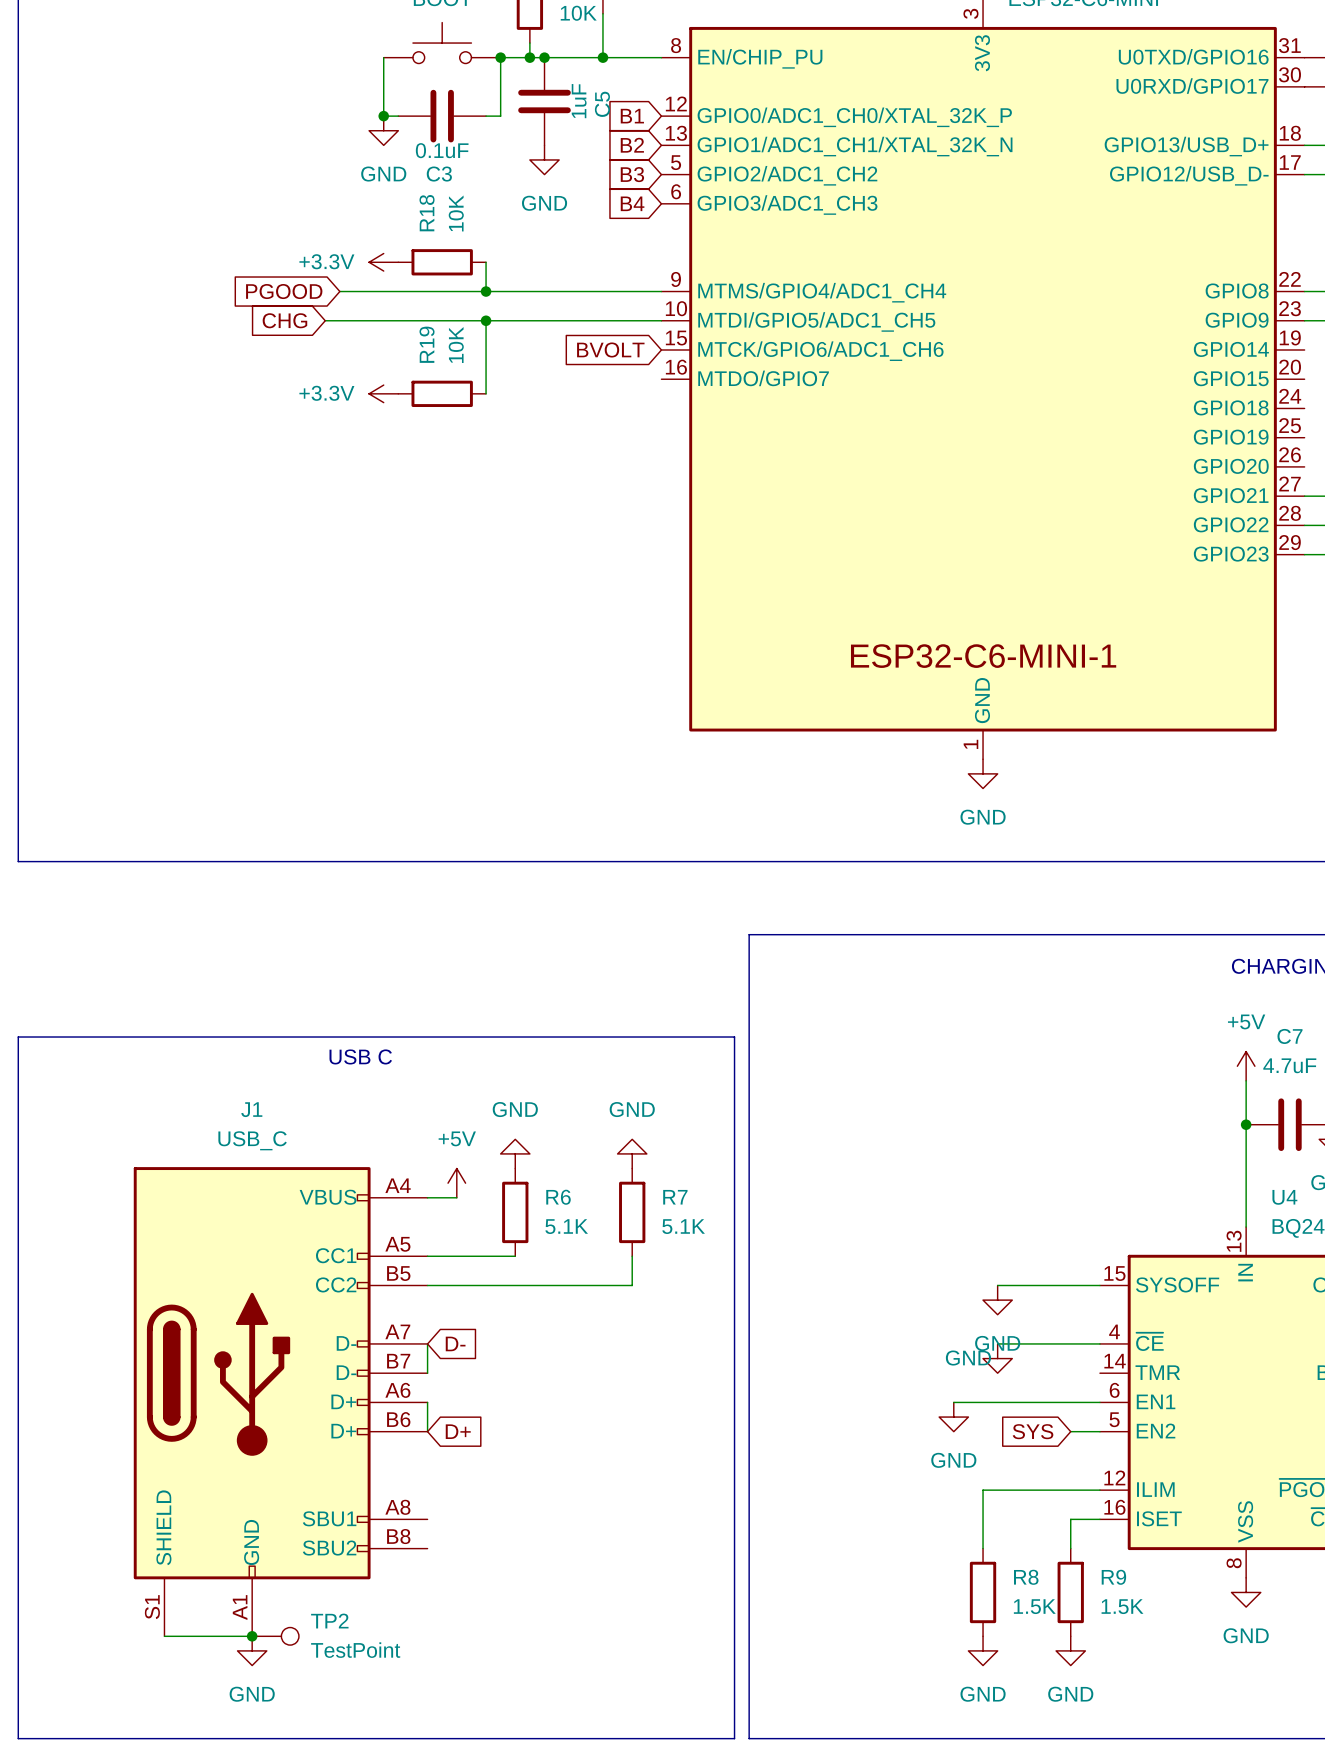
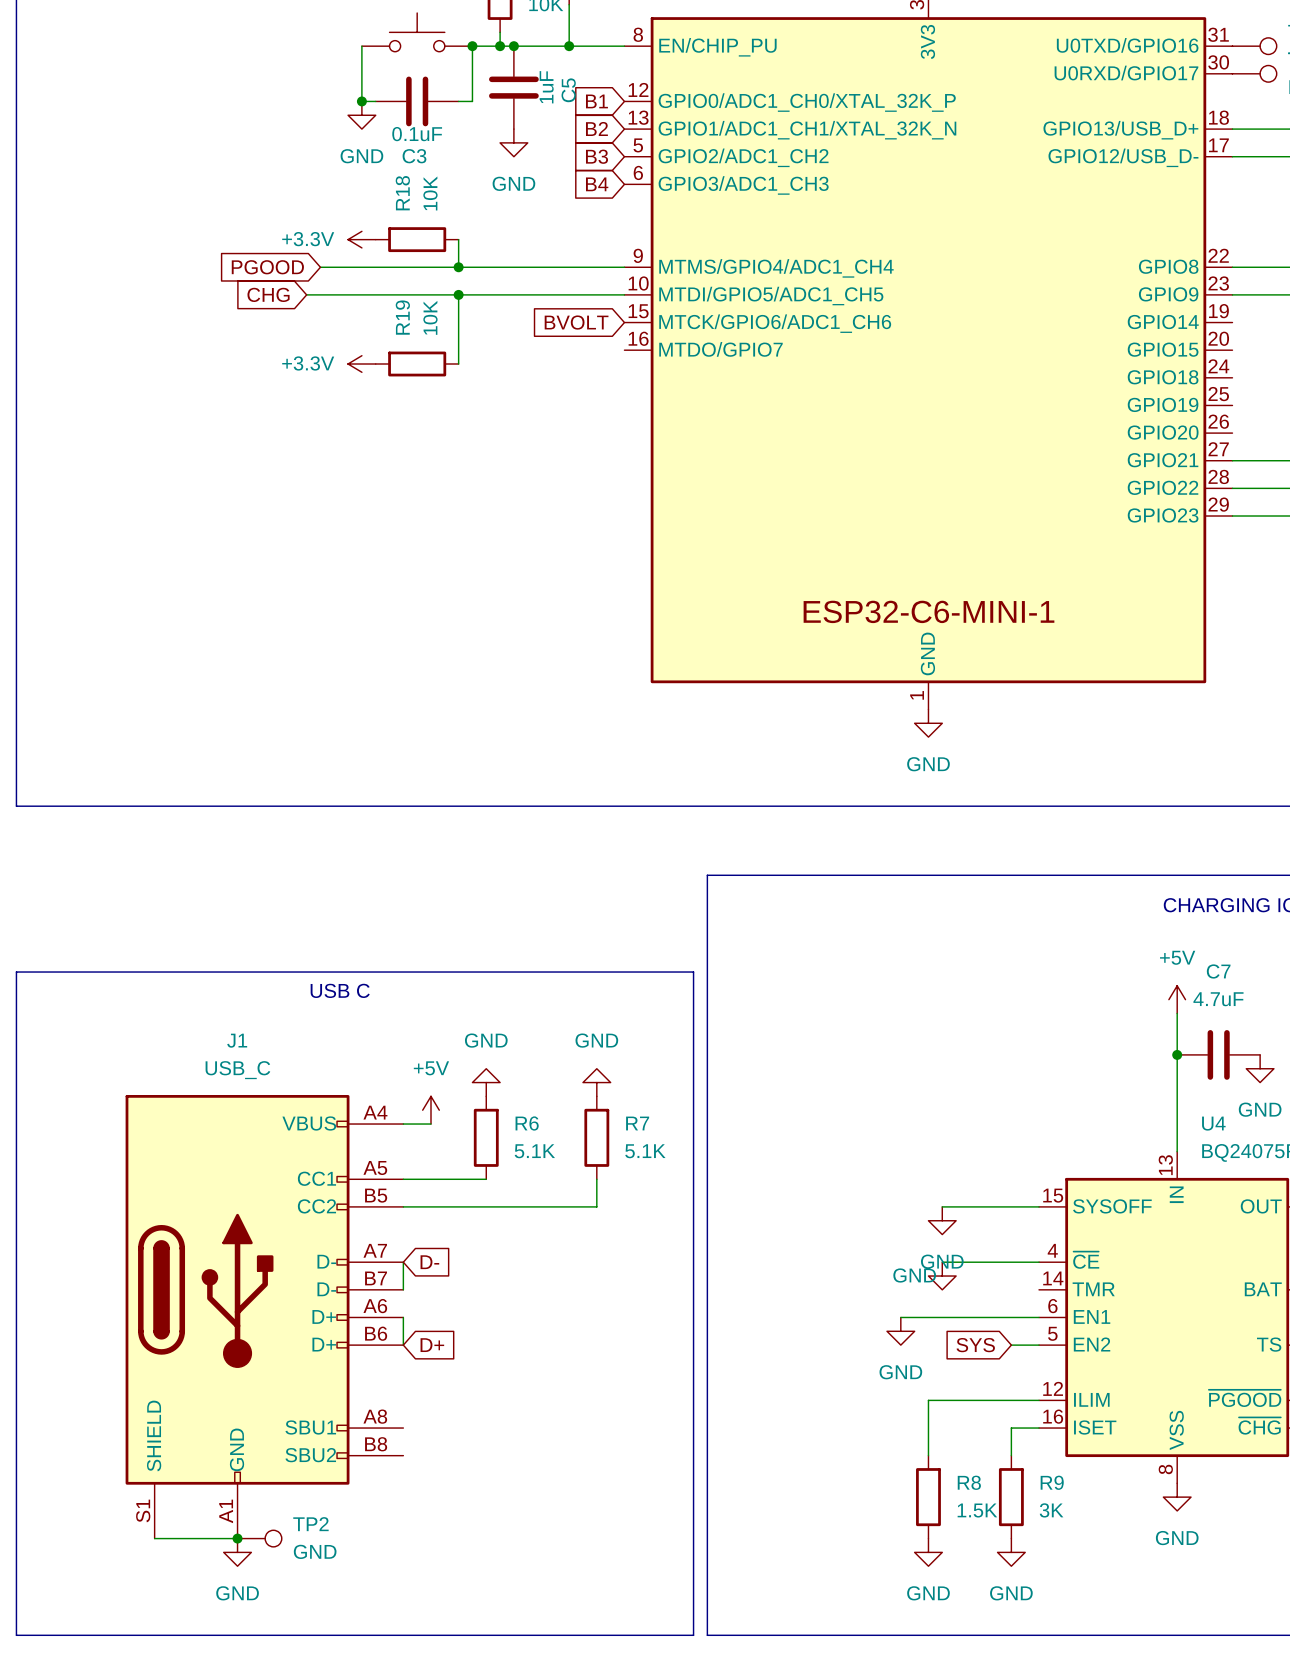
R9 value: 1.5K (1122, 1606) -> 3K (1051, 1510)
TP2 value: TestPoint (355, 1650) -> GND (315, 1551)

